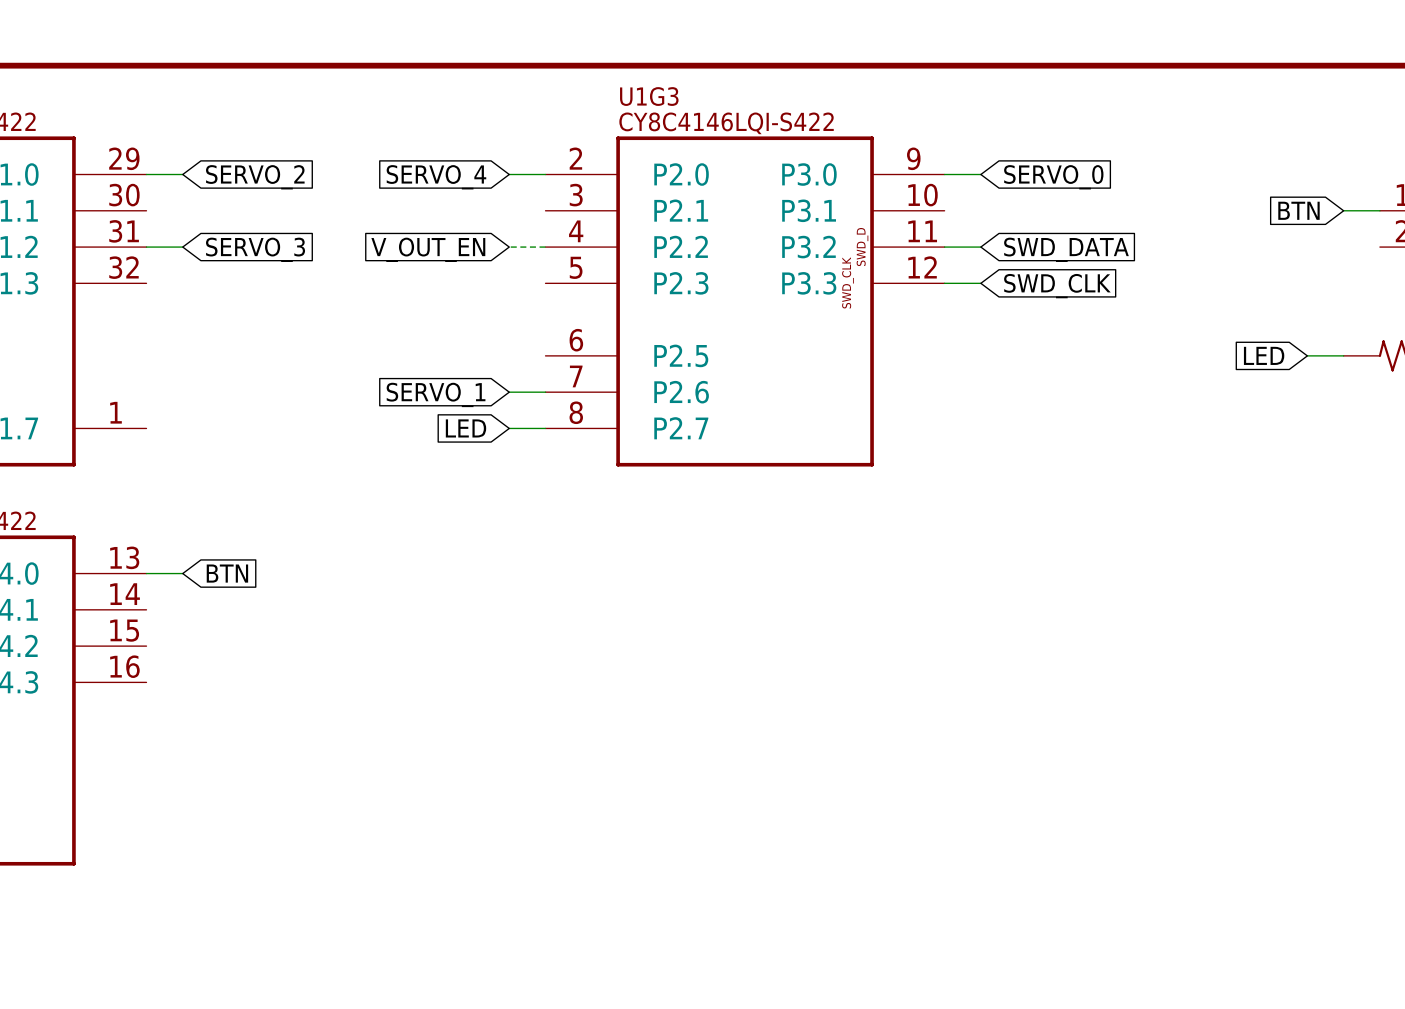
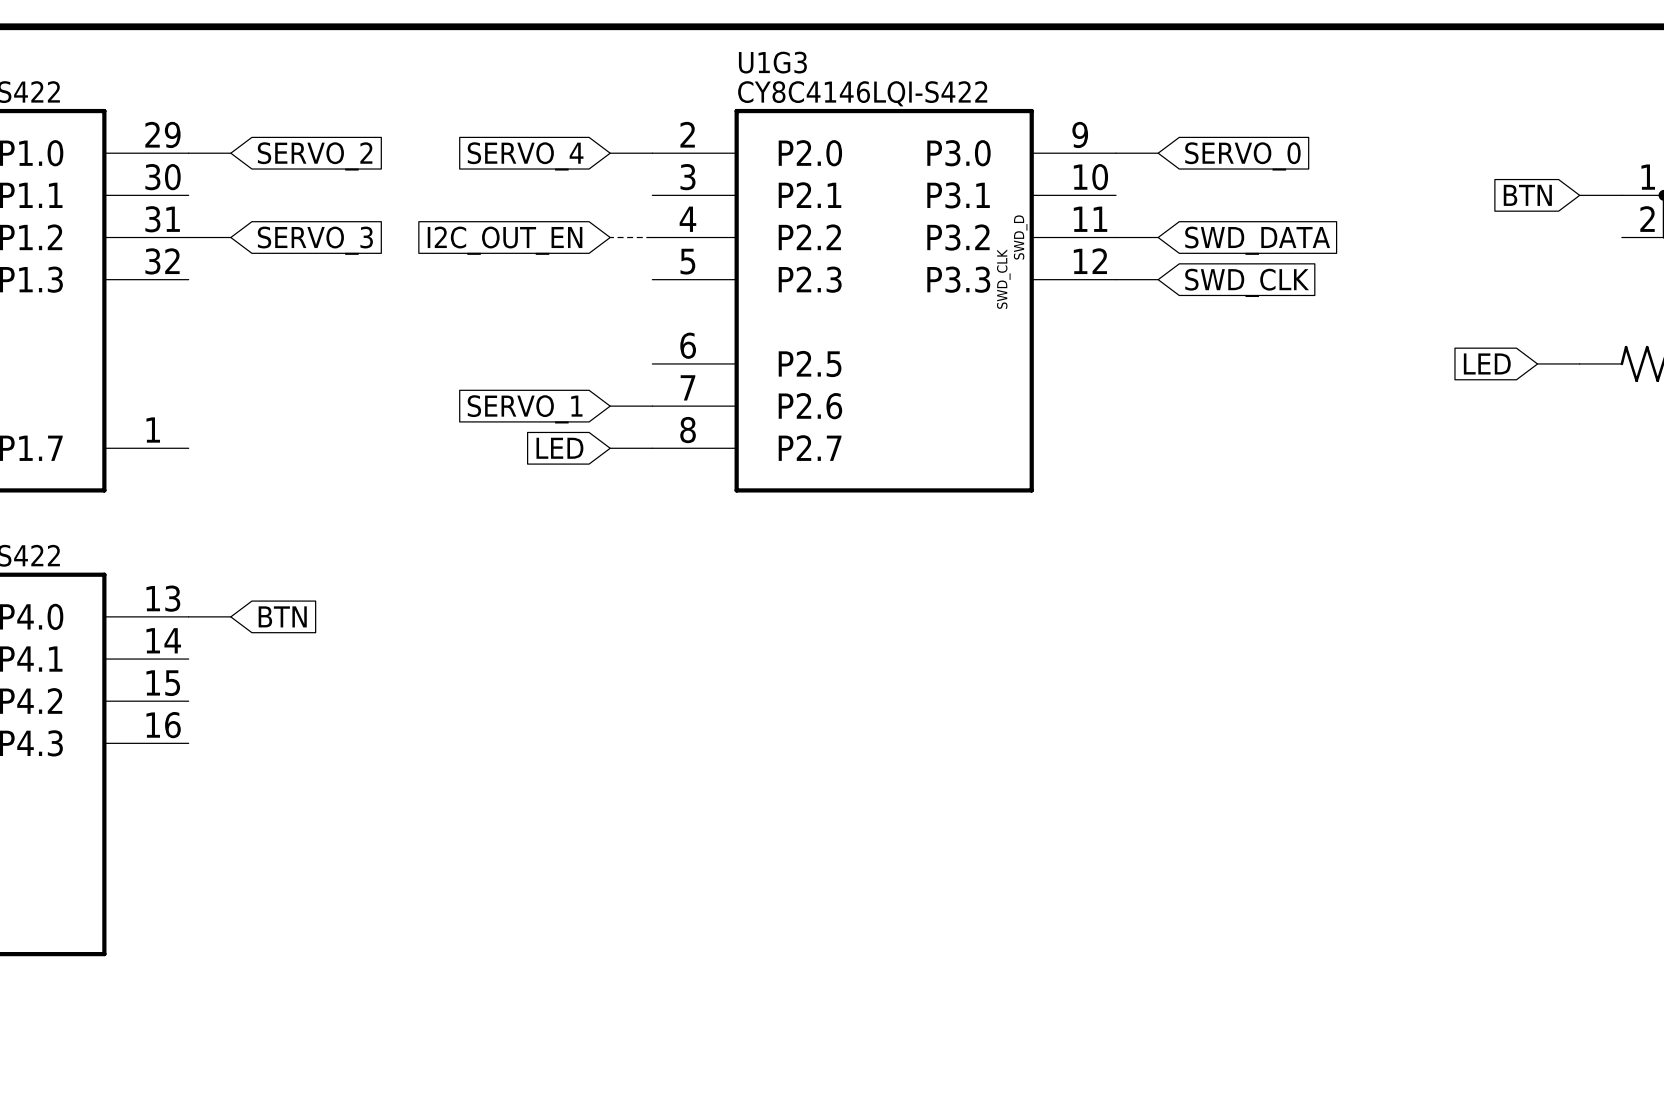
global label: V_OUT_EN (428, 249) -> I2C_OUT_EN (505, 240)

